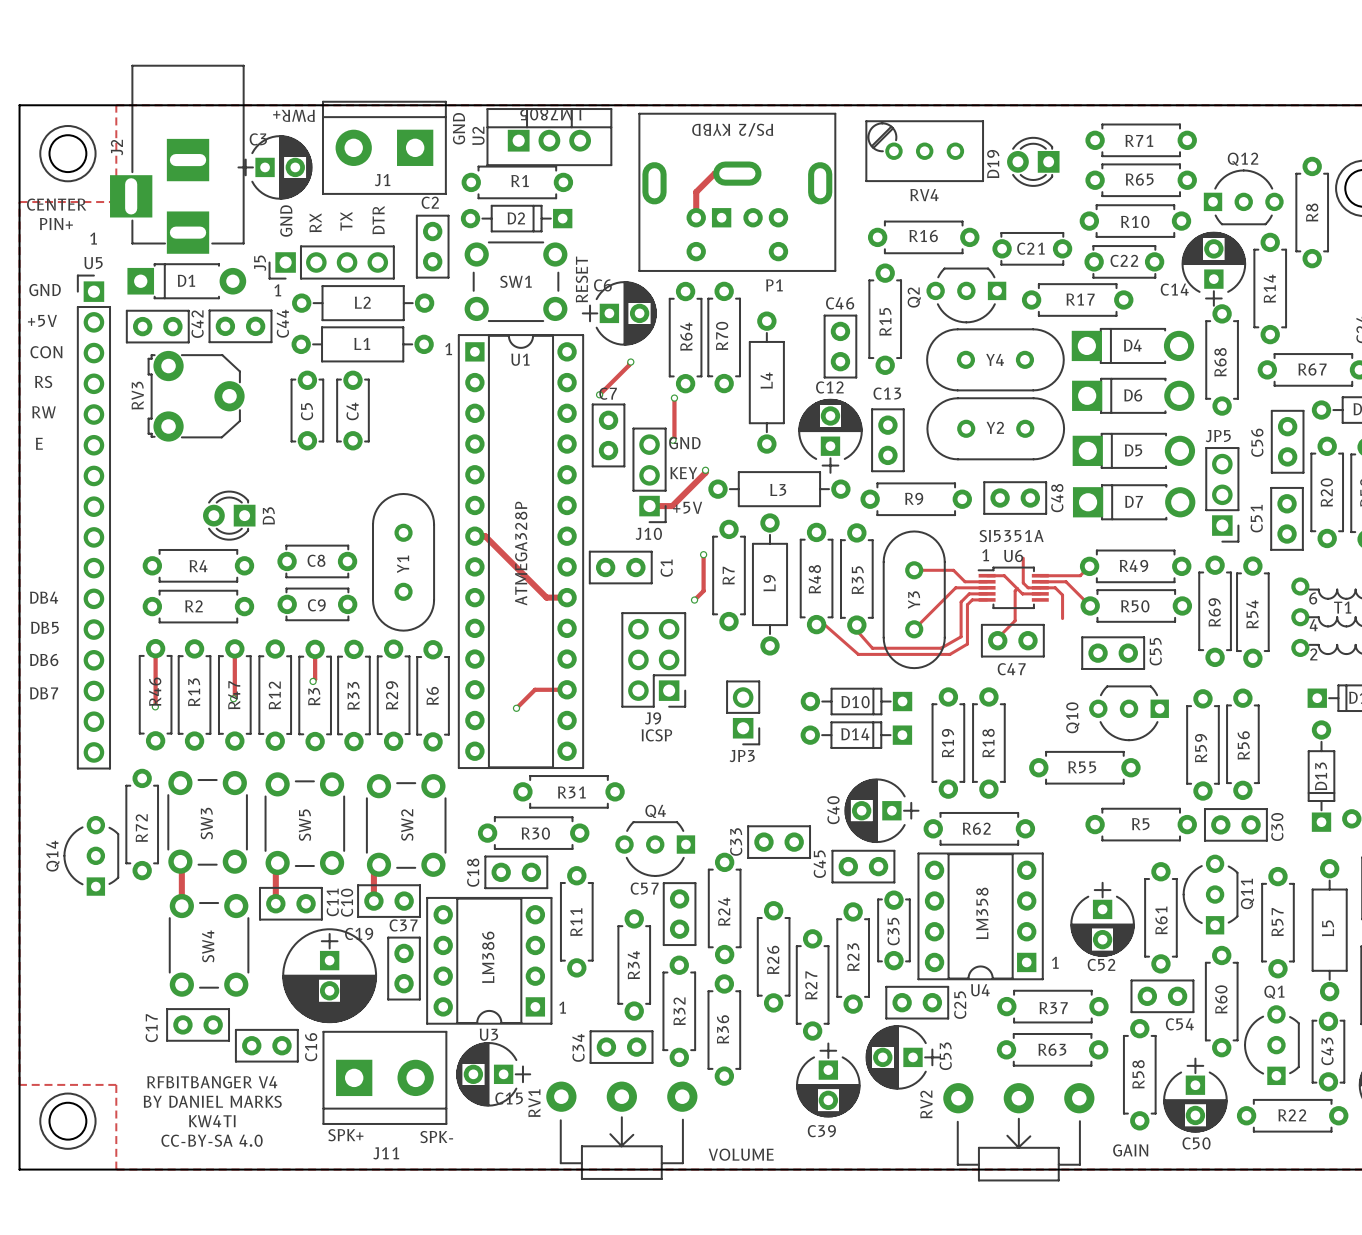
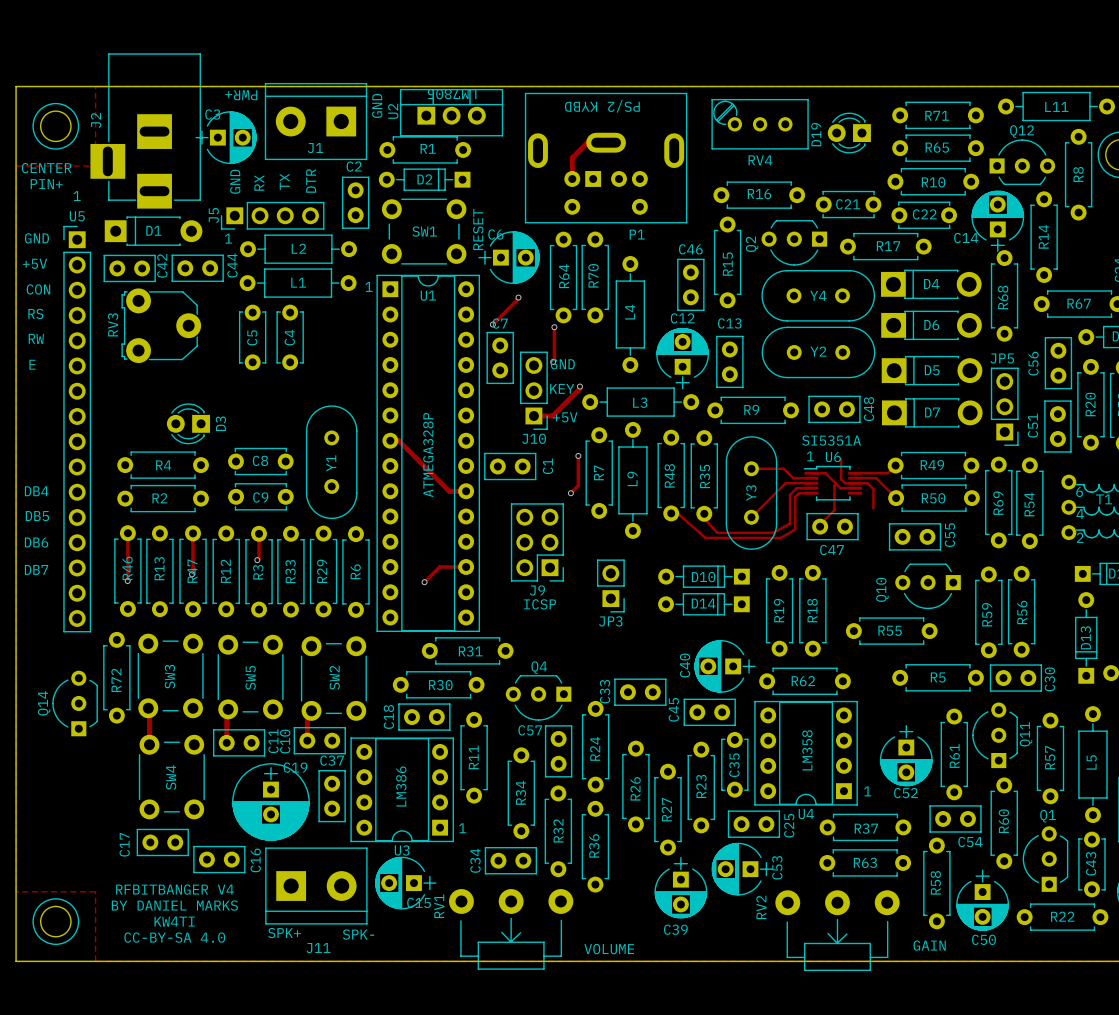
L11: none -> (1056, 106)

